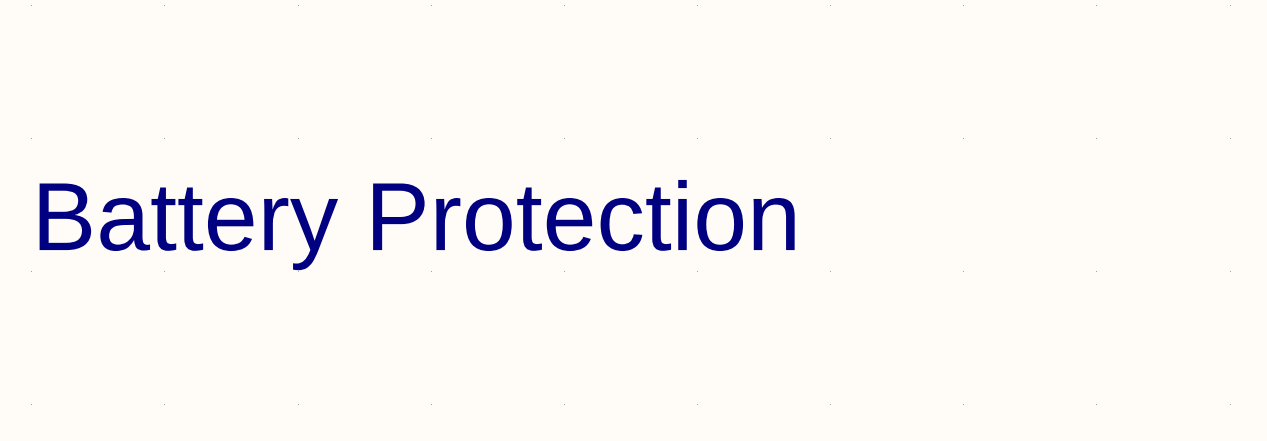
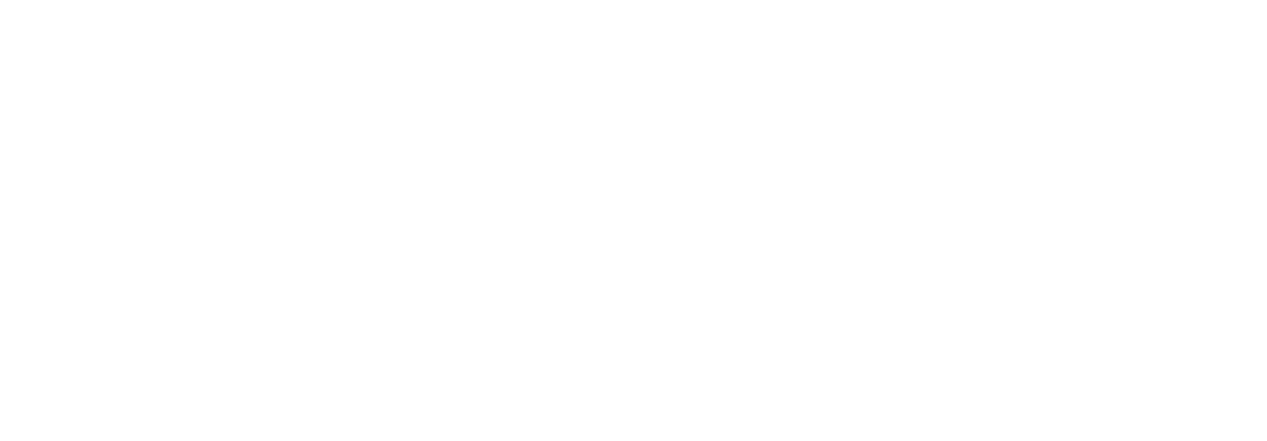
text: Battery Protection (417, 225) -> none

